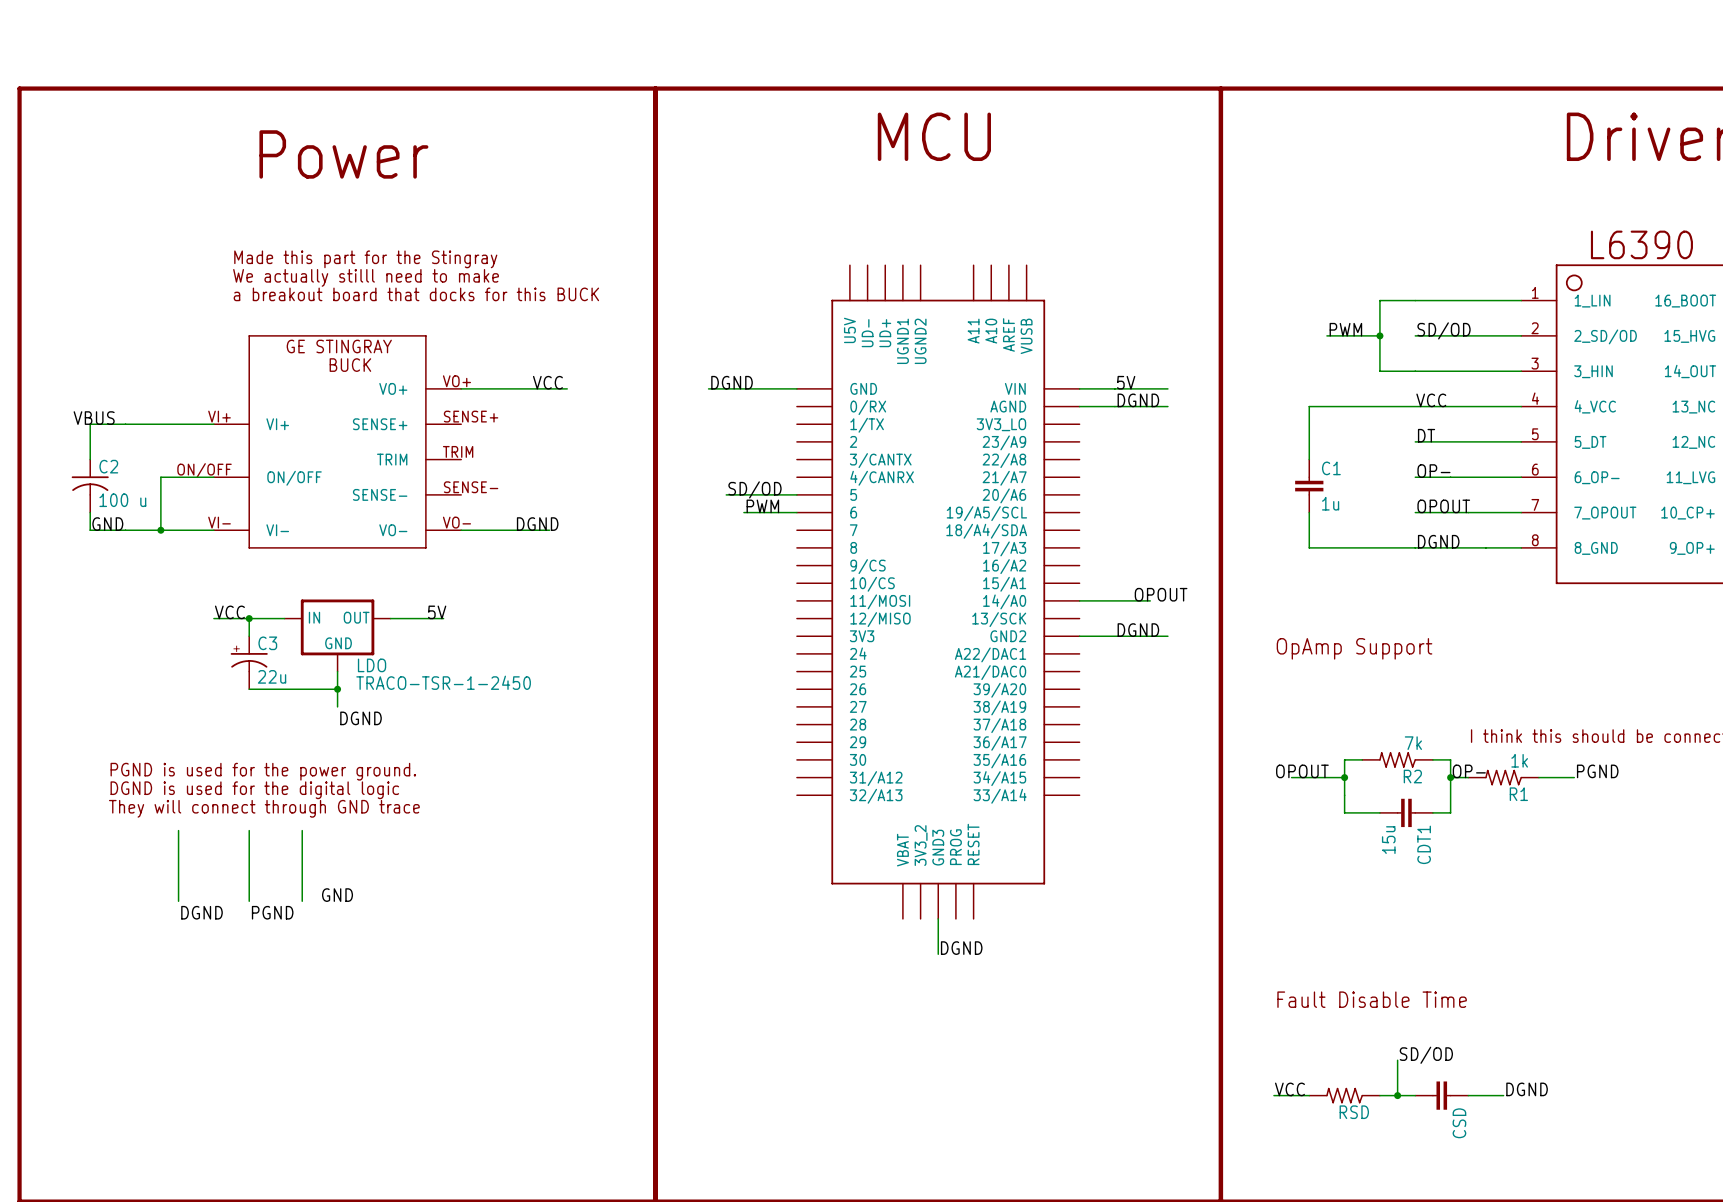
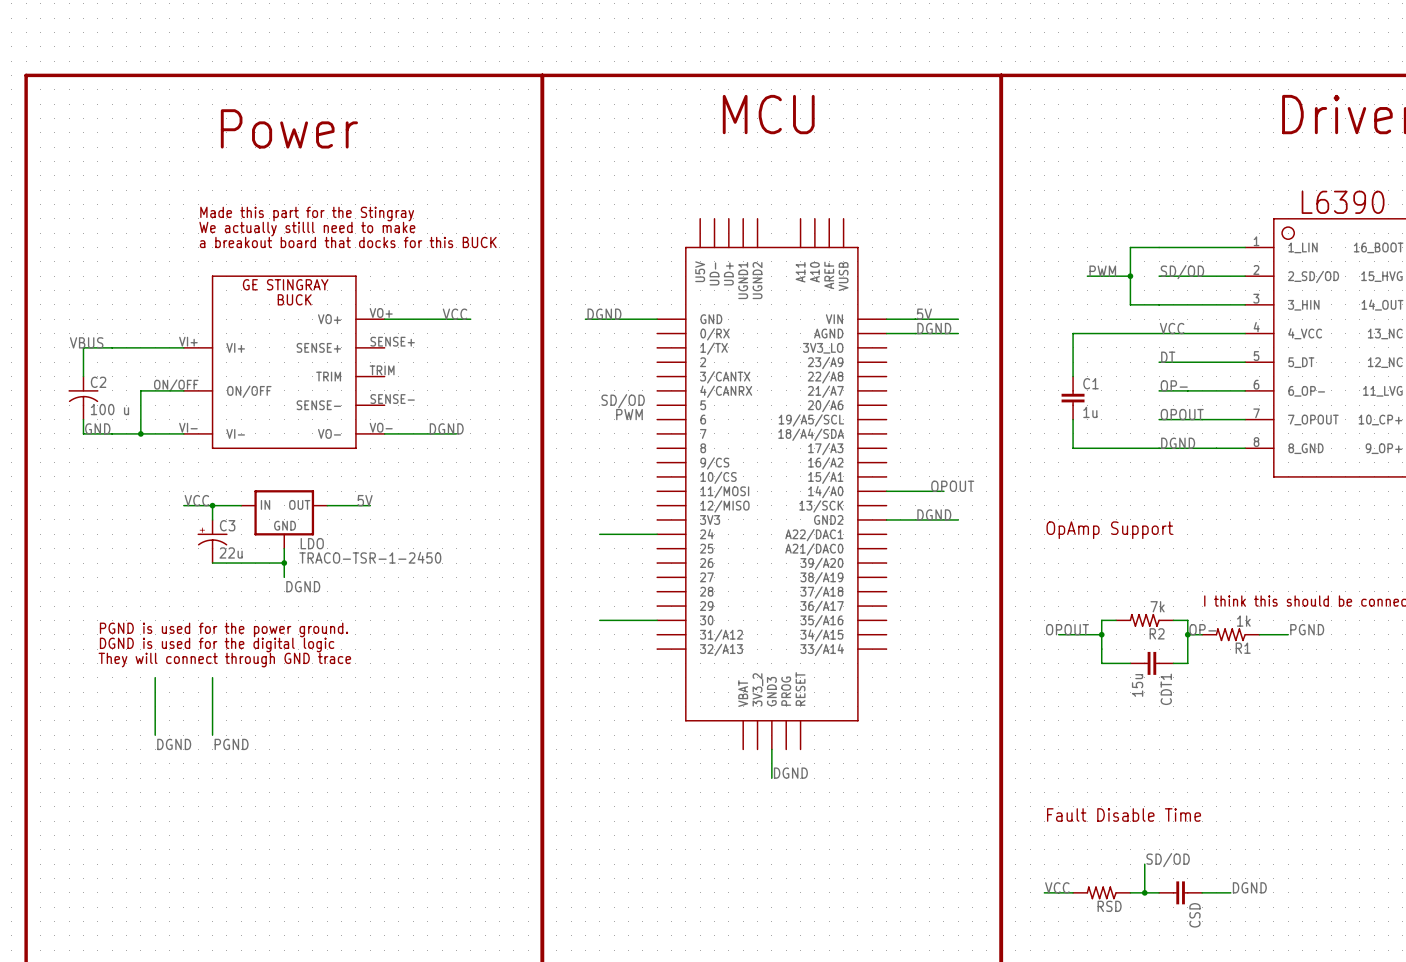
wire: (726, 494) (796, 494) -> (599, 534) (657, 534)
wire: (743, 512) (796, 512) -> none
wire: none -> (599, 620) (657, 620)
wire: (302, 830) (302, 901) -> none
label: GND (337, 895) -> none

